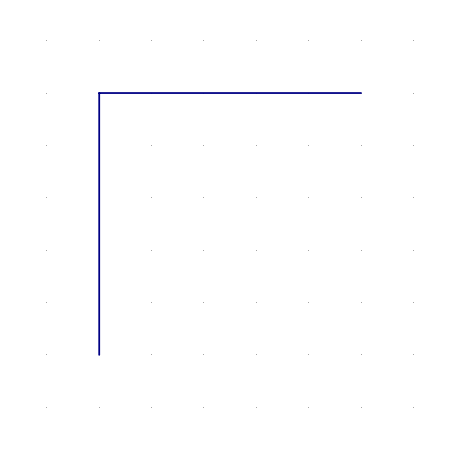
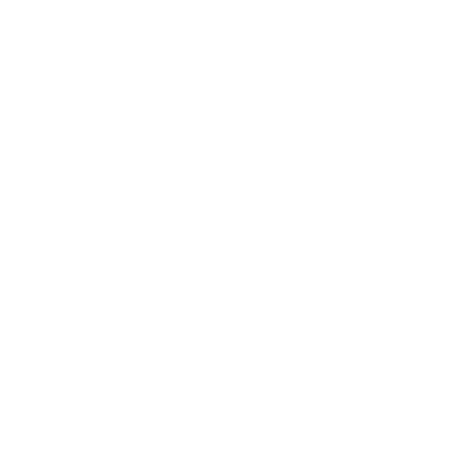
line: (361, 93) (99, 93) (99, 354) -> none

